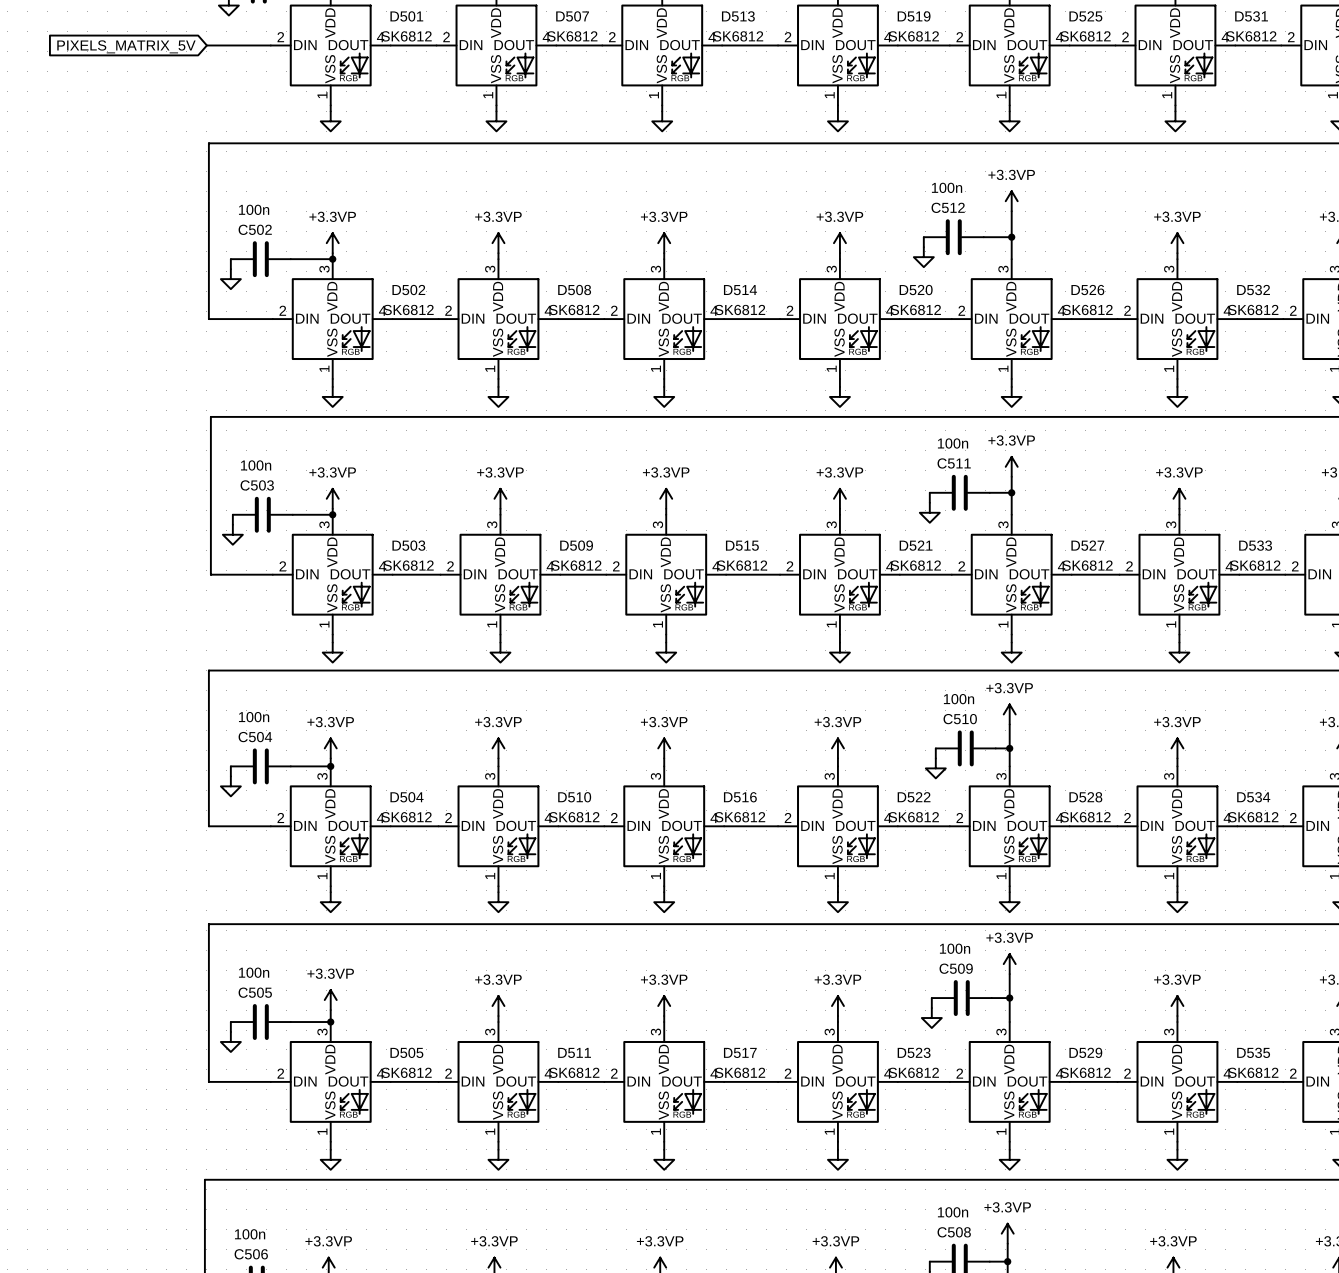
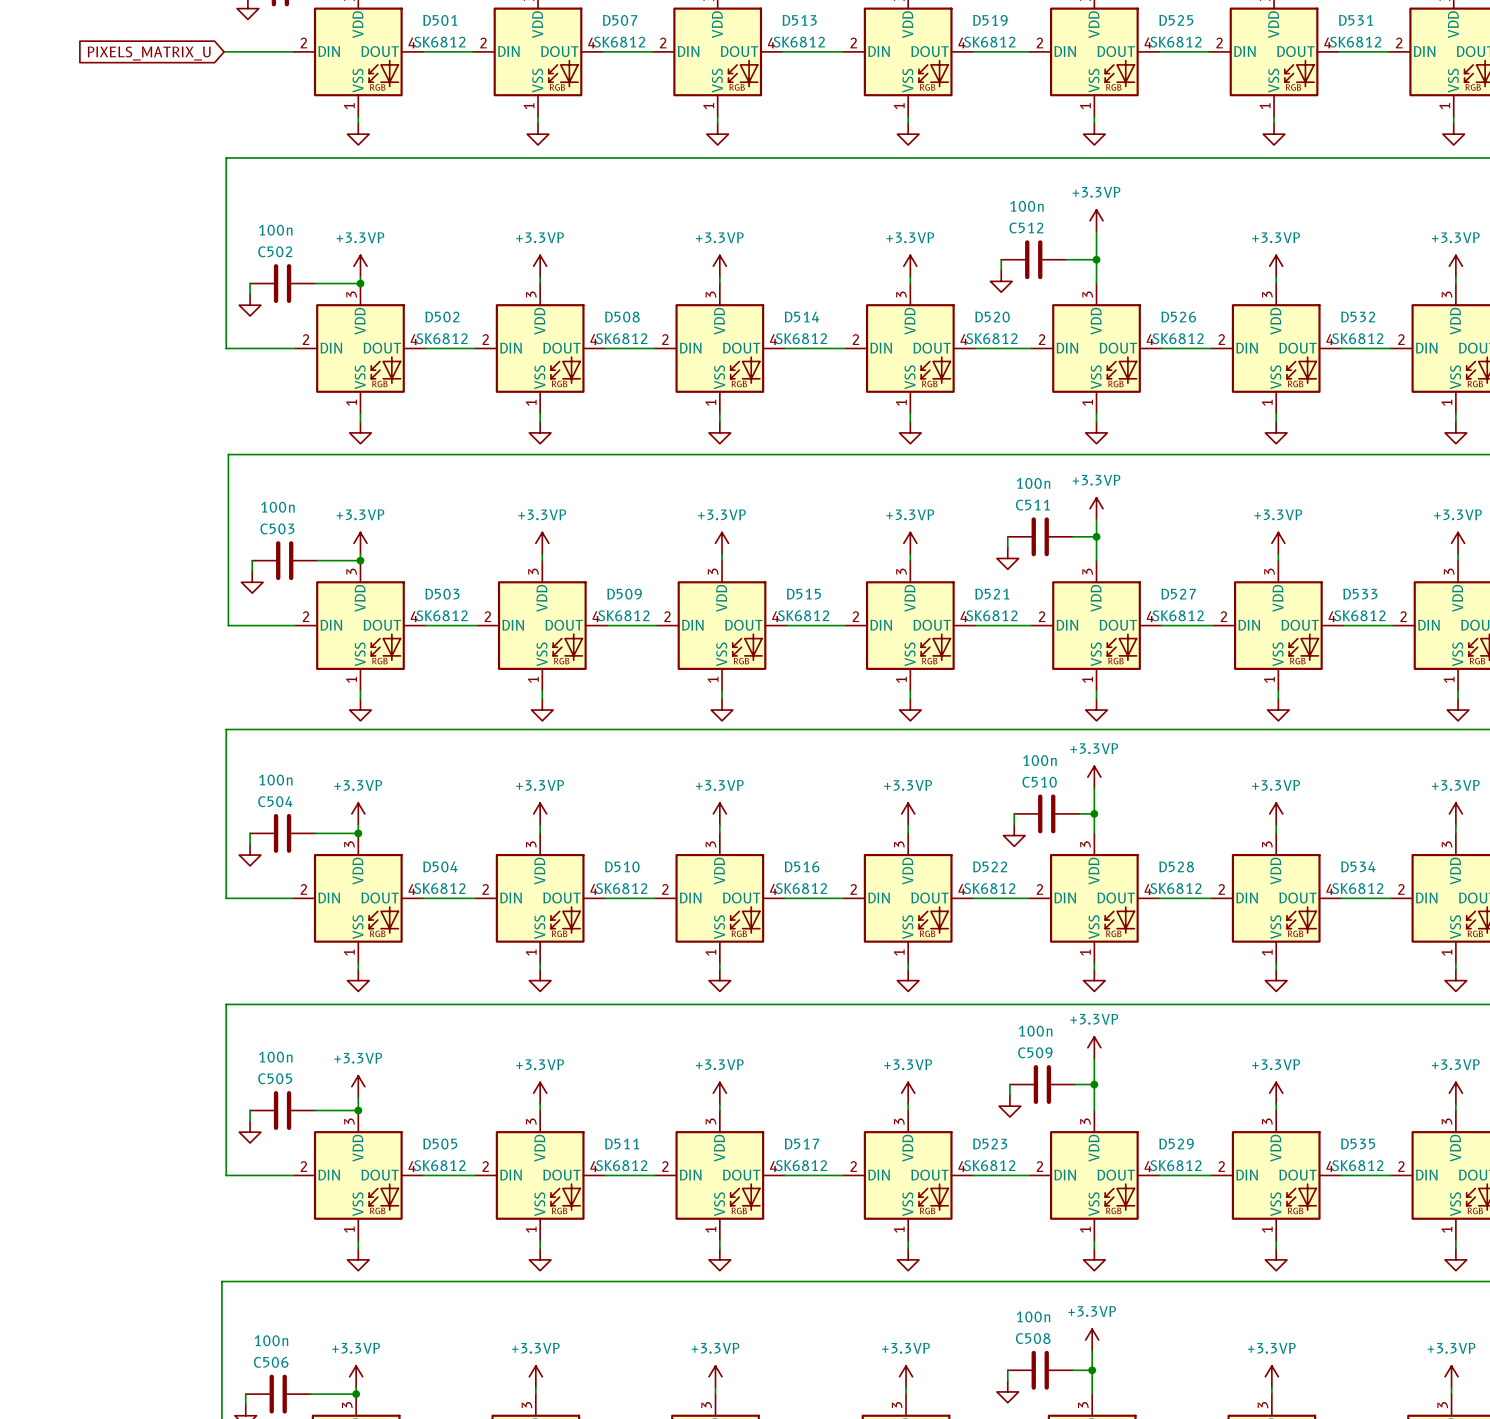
global label: PIXELS_MATRIX_5V (126, 46) -> PIXELS_MATRIX_U (149, 53)

